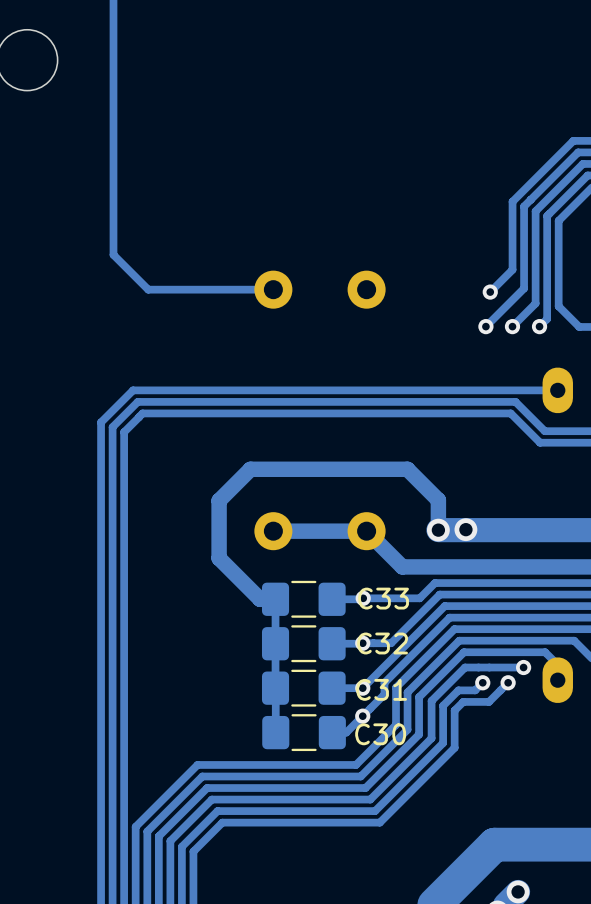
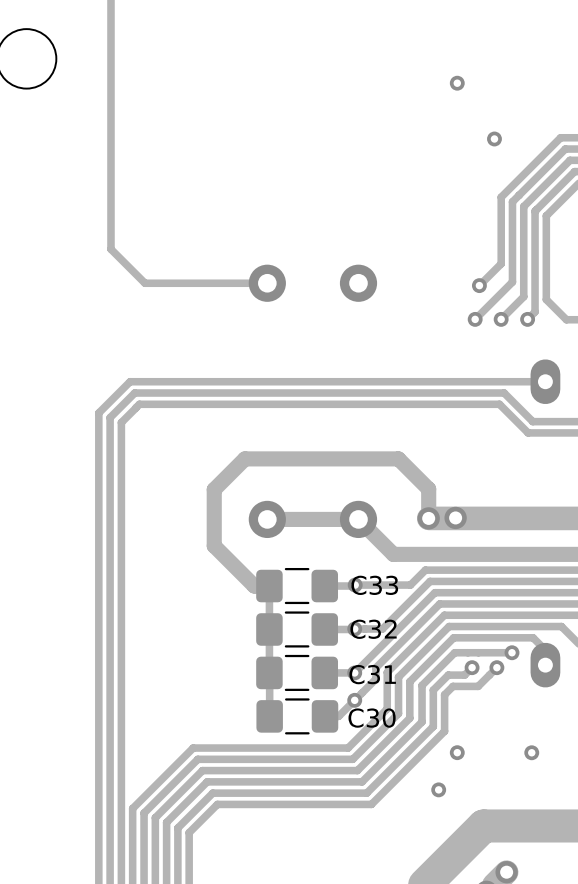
via: none -> (457, 83)
via: none -> (494, 138)
via: none -> (457, 752)
via: none -> (531, 752)
via: none -> (438, 789)

